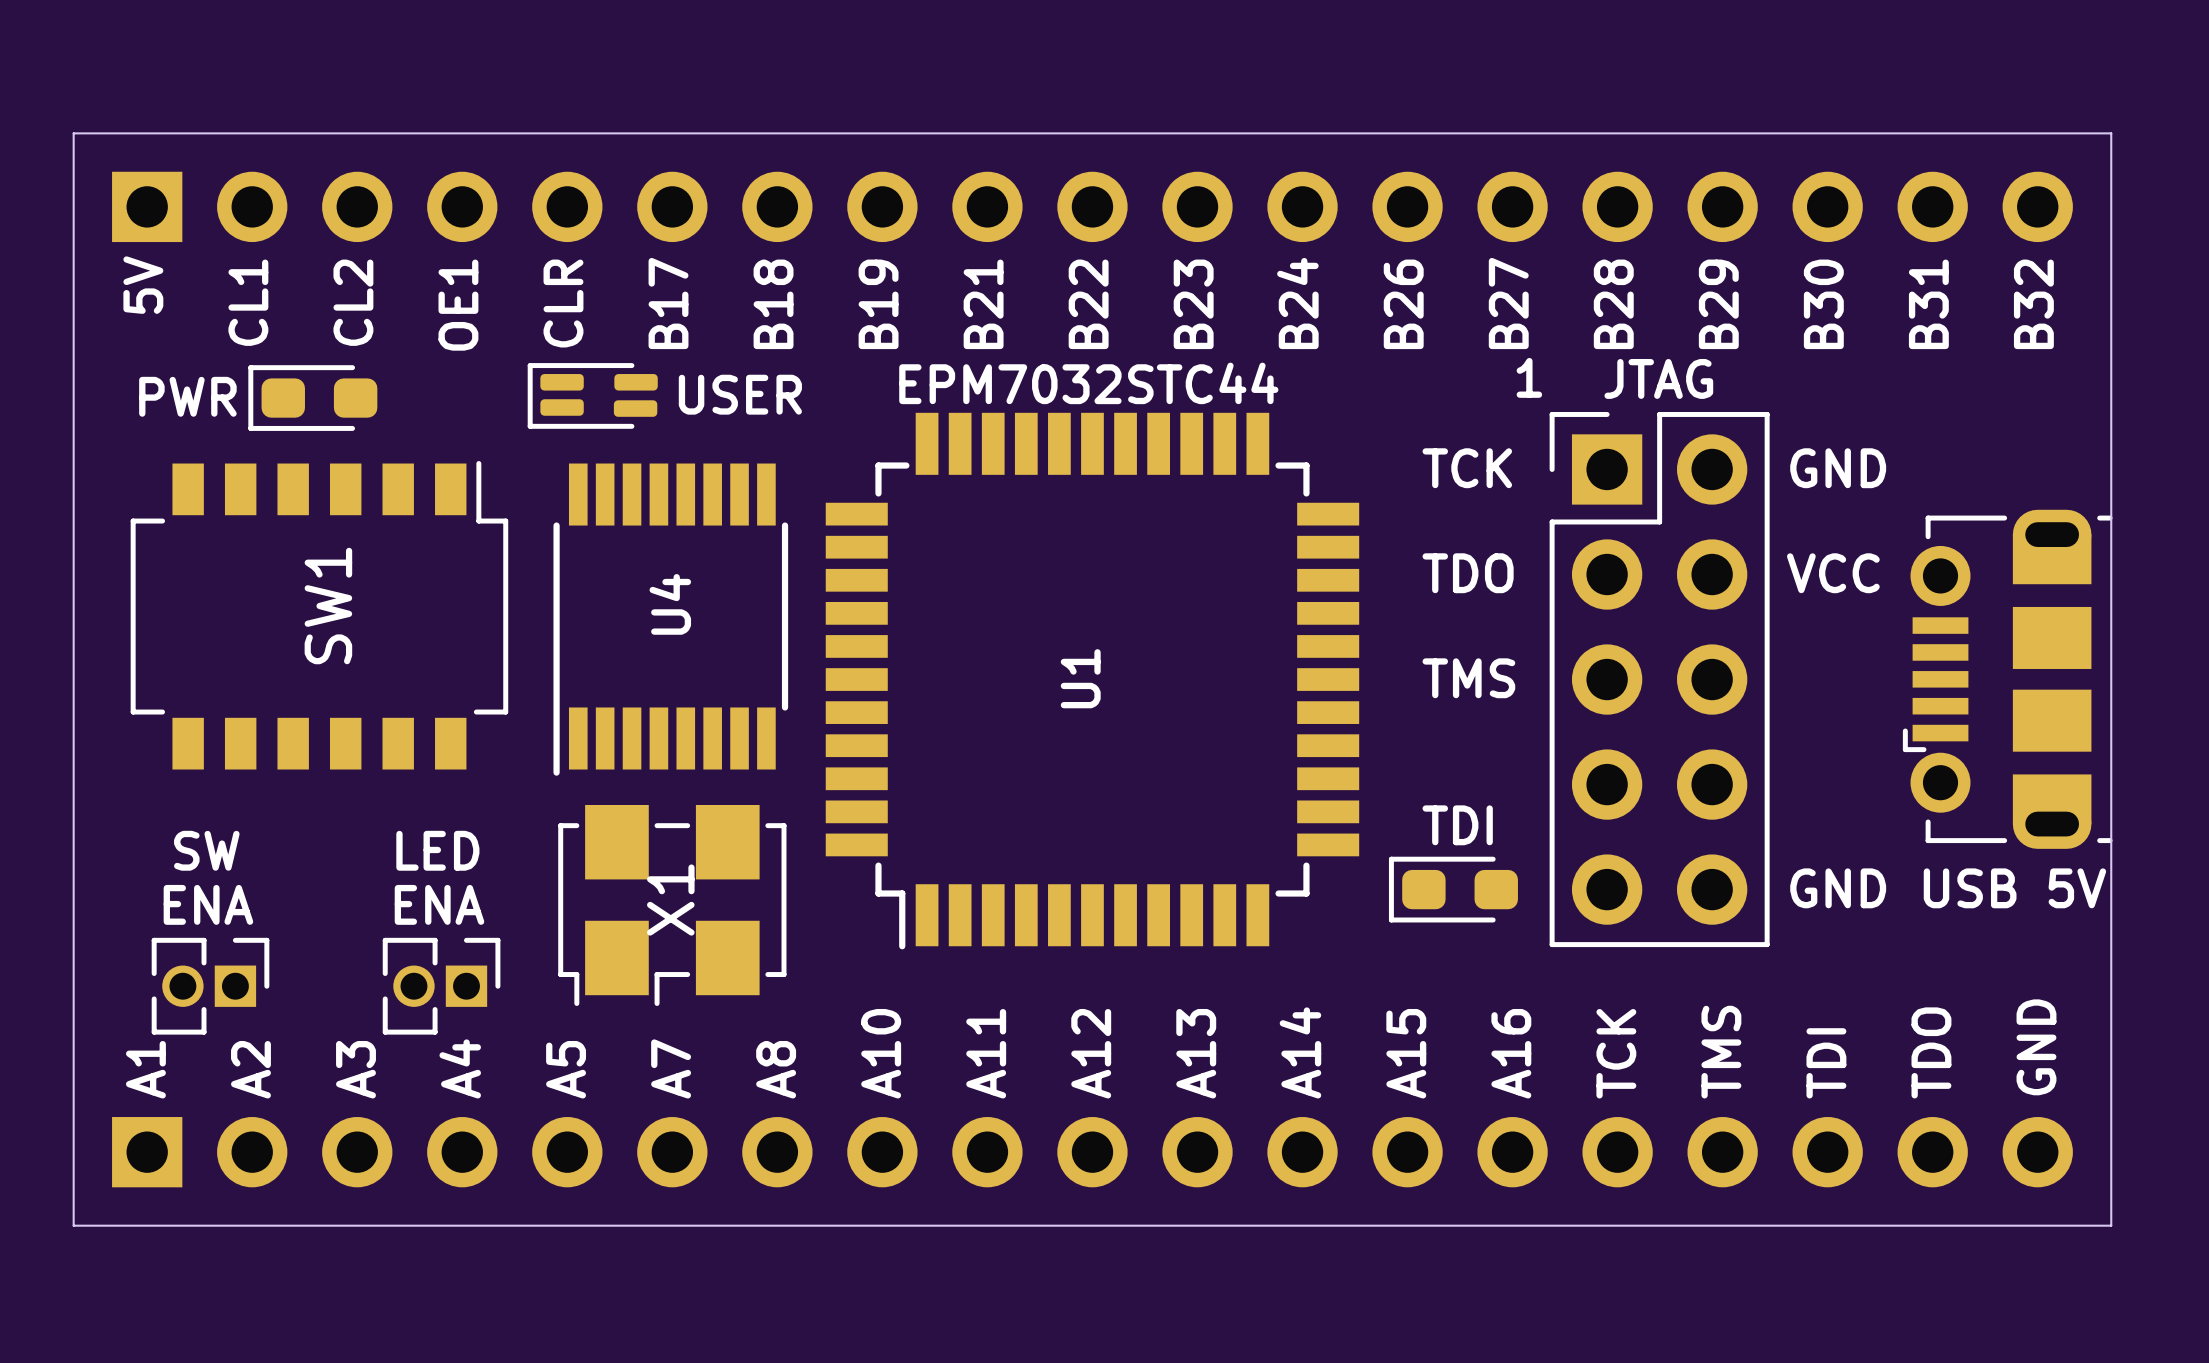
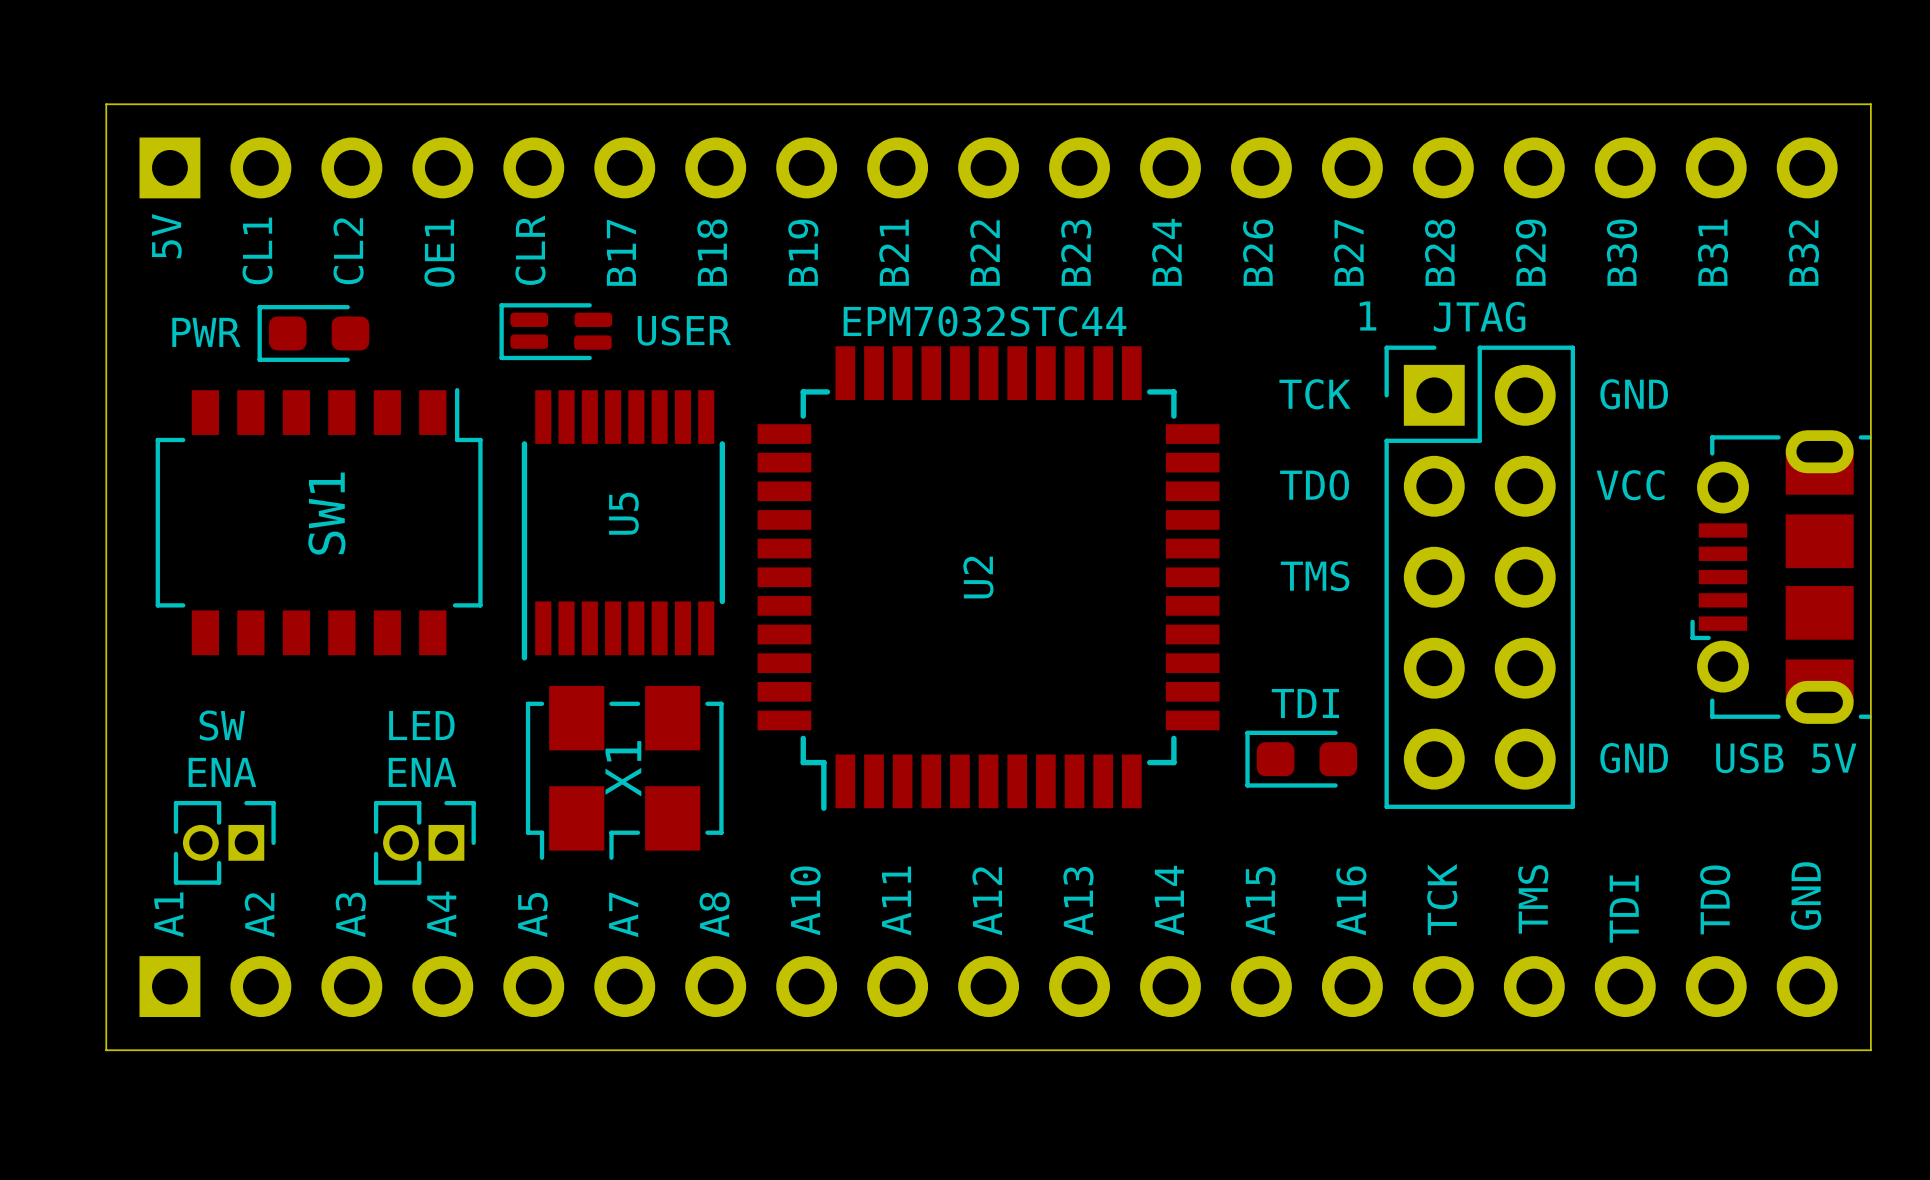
U4 name: U4 (670, 604) -> U5 (623, 513)
U1 name: U1 (1080, 678) -> U2 (978, 577)

